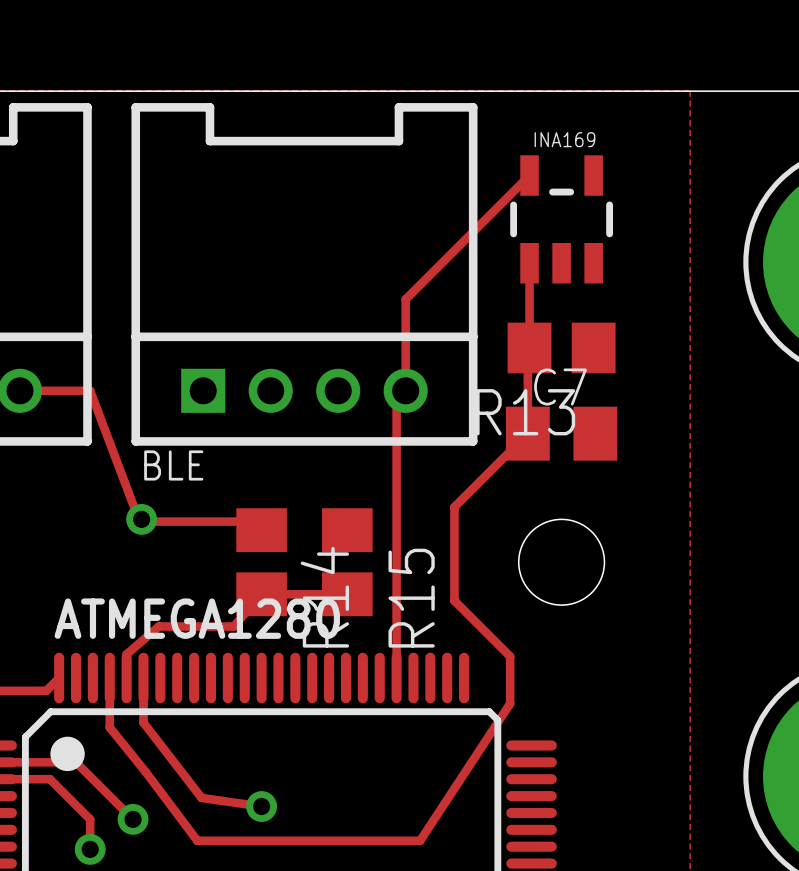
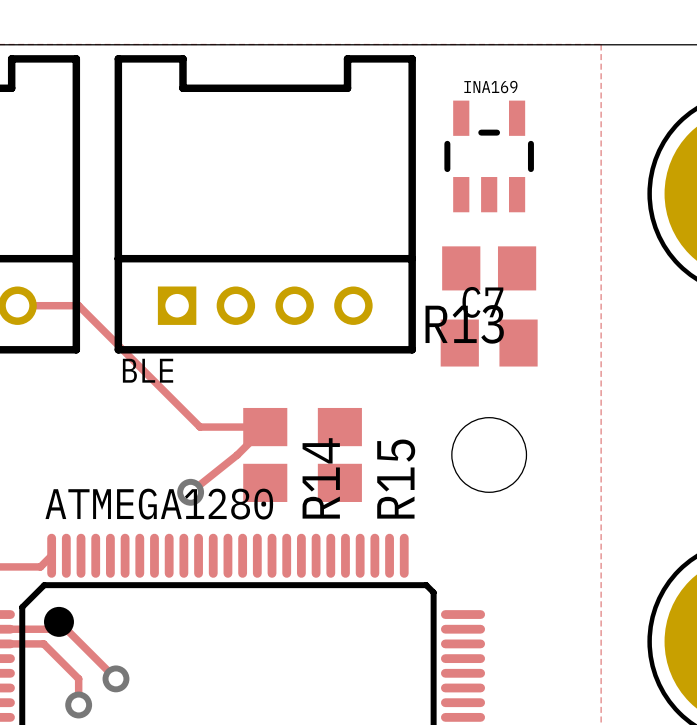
track: (529, 175) (405, 299) (405, 390) (396, 399) (396, 677) -> none
track: (529, 263) (527, 433) (454, 507) (454, 600) (510, 656) (510, 703) (420, 840) (197, 840) (109, 727) (109, 677) -> none
track: (90, 390) (139, 521) -> (78, 305) (200, 427) (265, 427) (237, 454) (190, 492)
via: (141, 519) -> none
track: (139, 521) (253, 521) (261, 530) -> none
R14 position: (261, 562) -> (265, 454)
R15 position: (347, 562) -> (339, 454)
track: (347, 594) (261, 594) (233, 626) (158, 626) (126, 654) (126, 677) -> none
via: none -> (190, 492)
track: (143, 677) (143, 722) (201, 797) (261, 806) -> none
via: (261, 806) -> none

